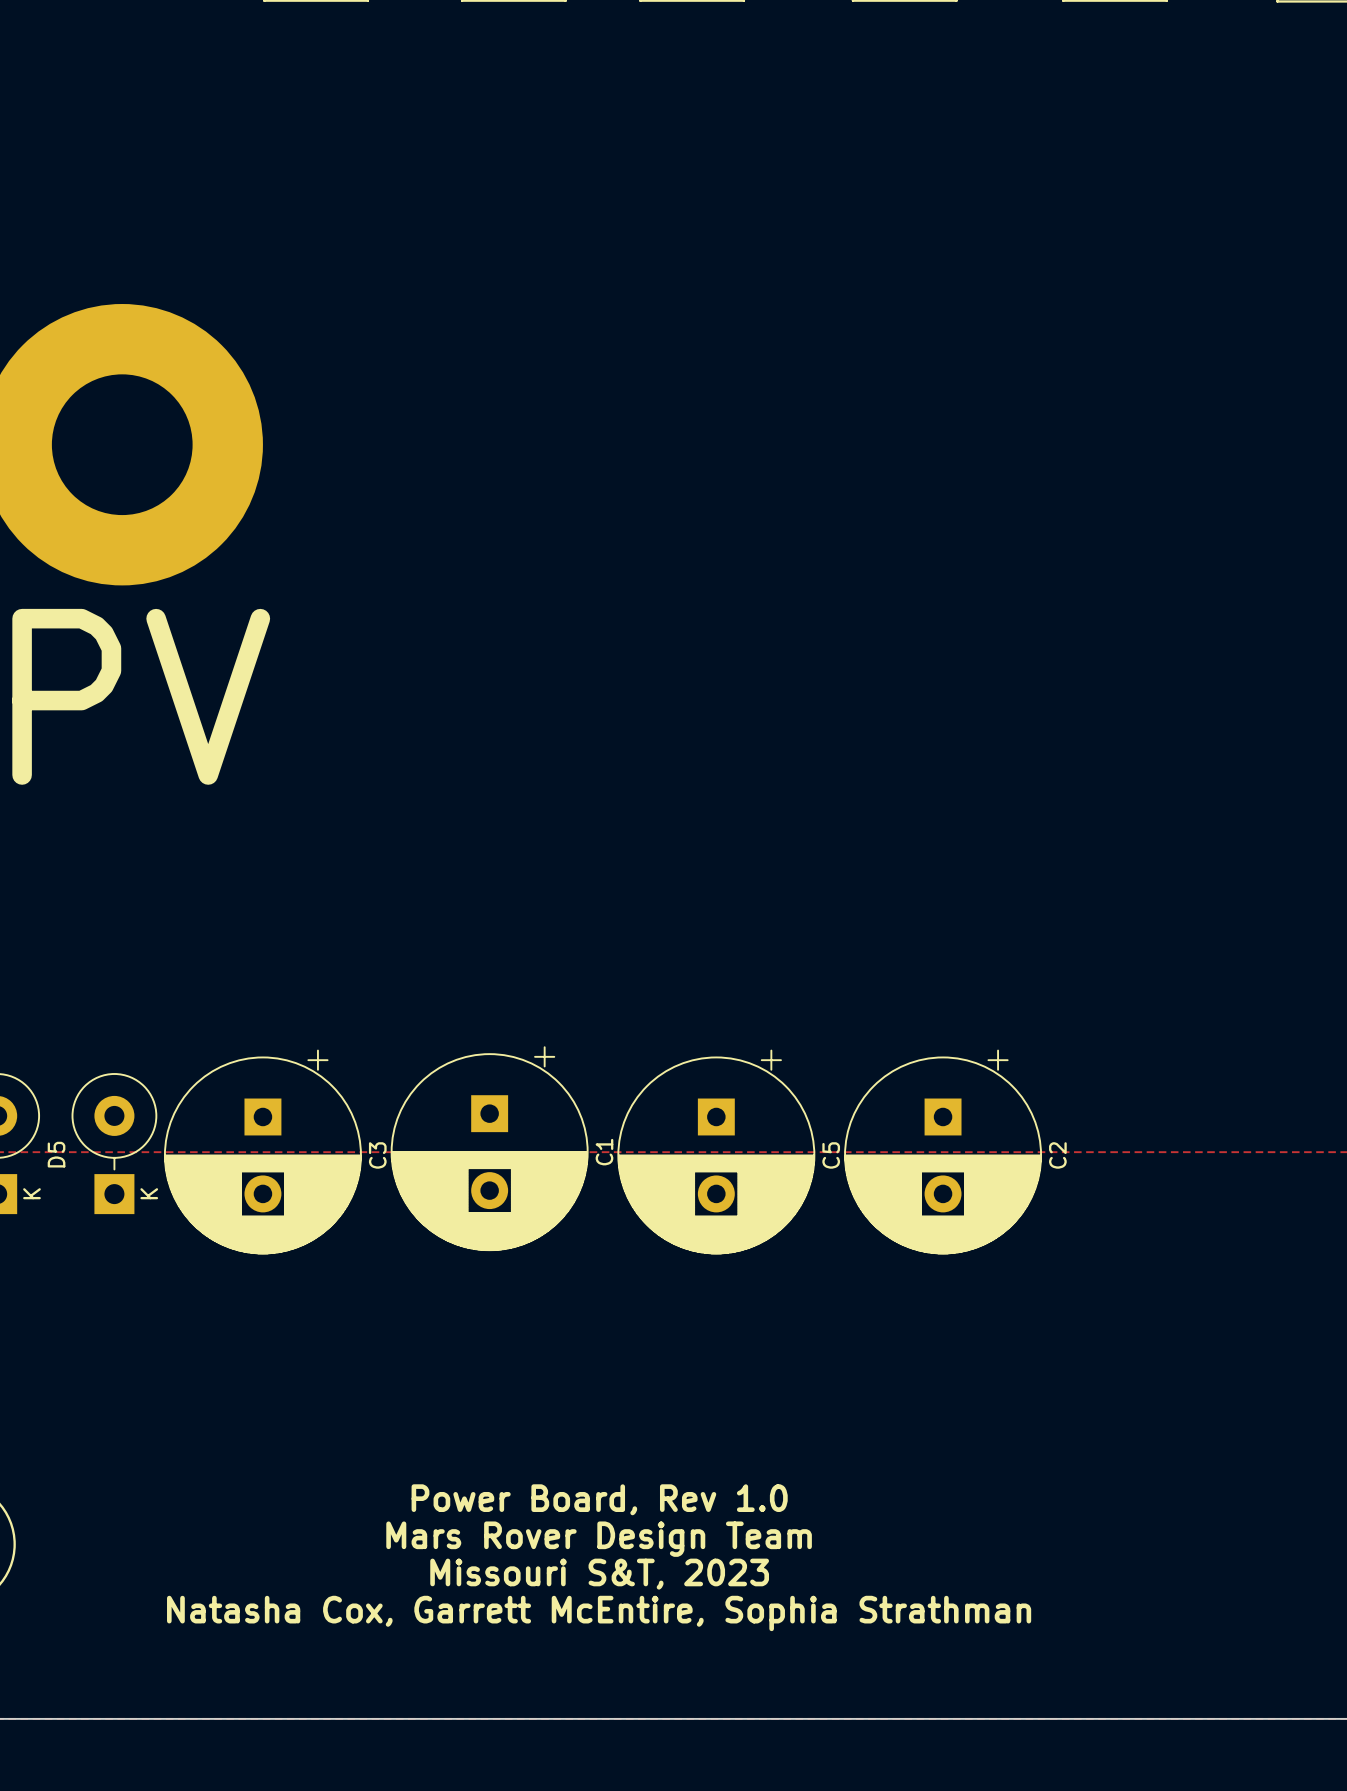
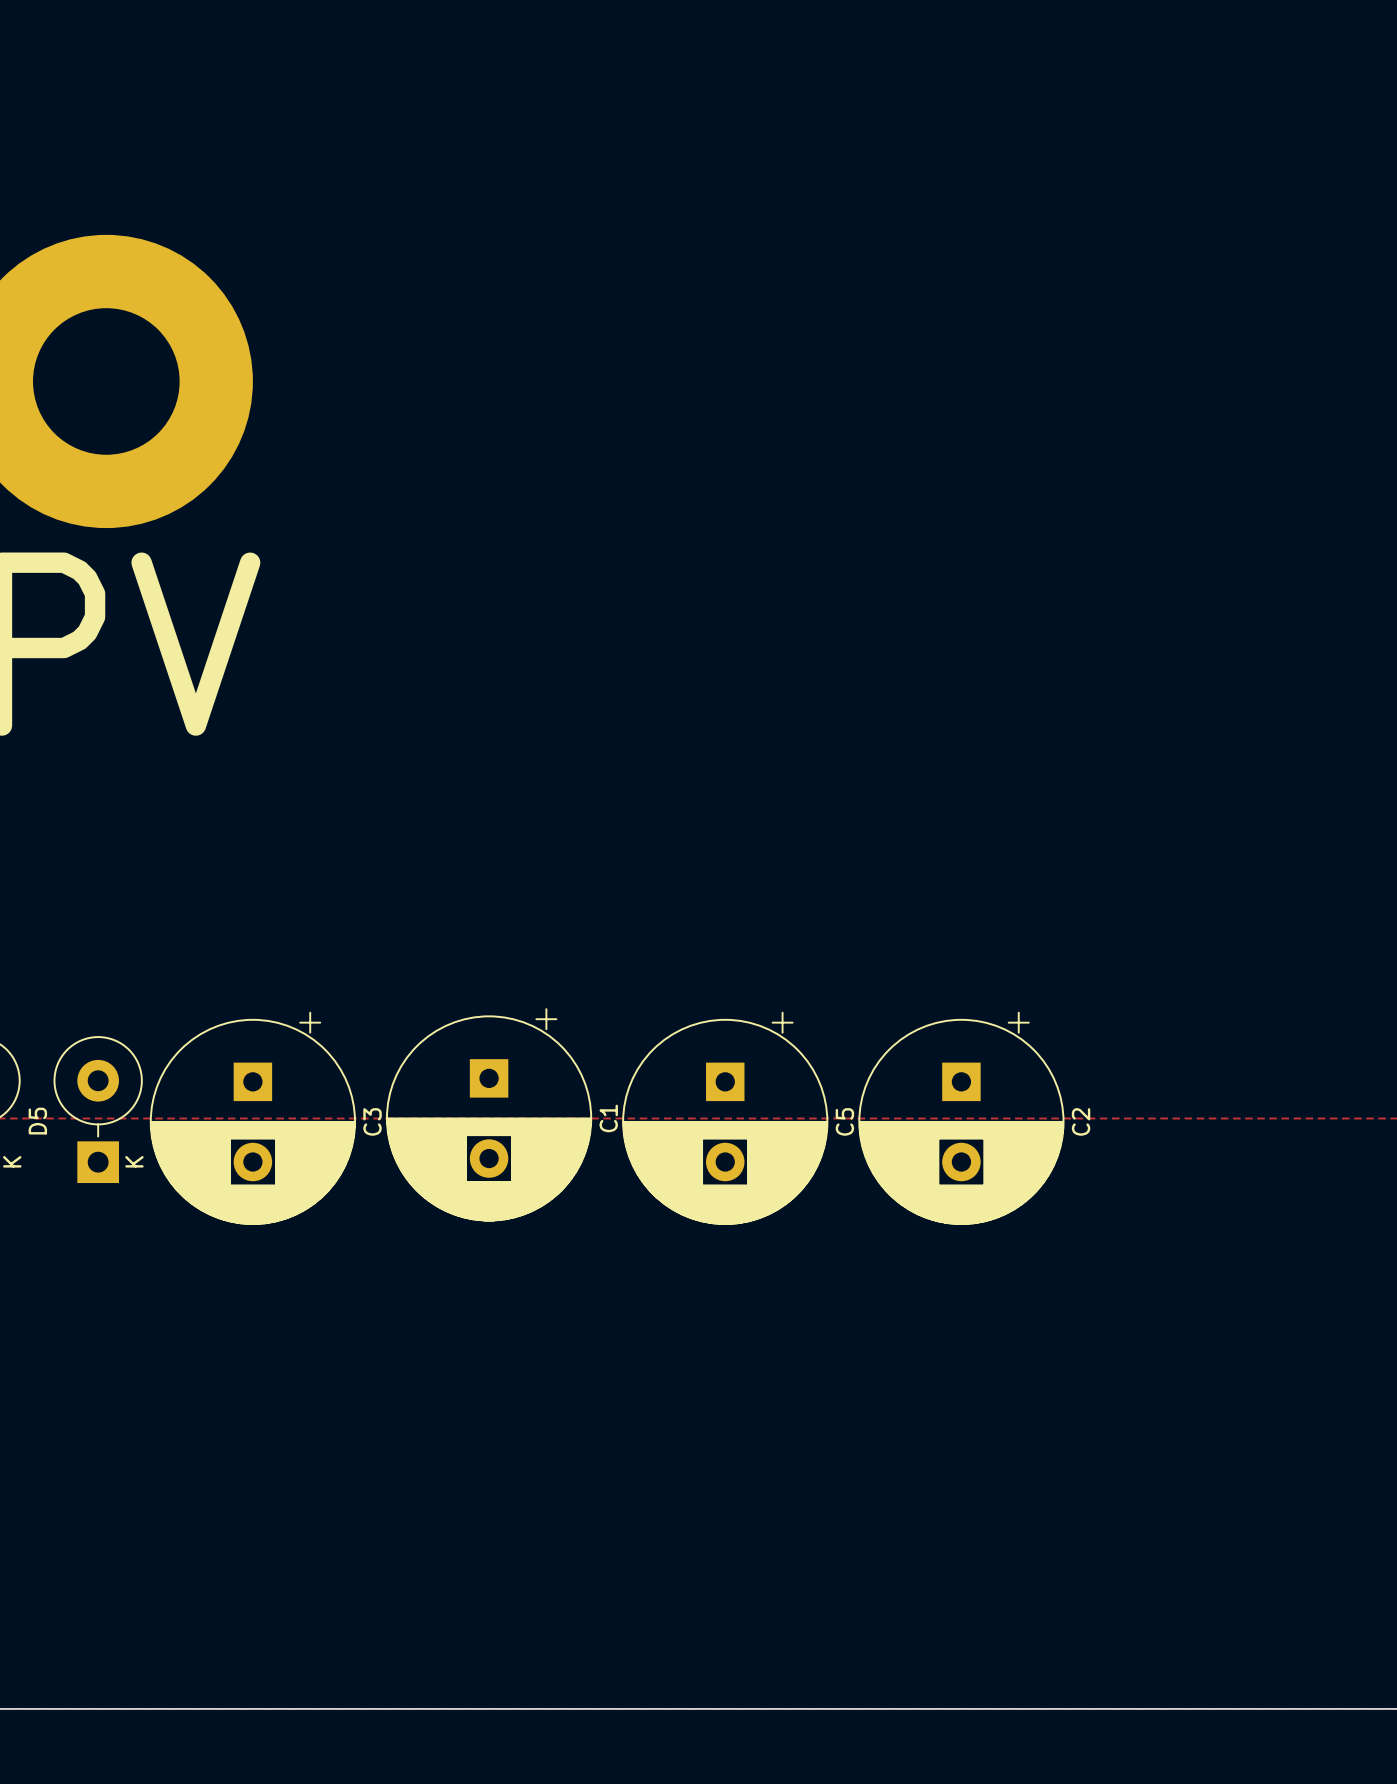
text: Power Board, Rev 1.0 (599, 1499) -> none
text: Mars Rover Design Team (599, 1539) -> none
text: Missouri S&T, 2023 (599, 1574) -> none
text: Natasha Cox, Garrett McEntire, Sophia Strathman (599, 1613) -> none

